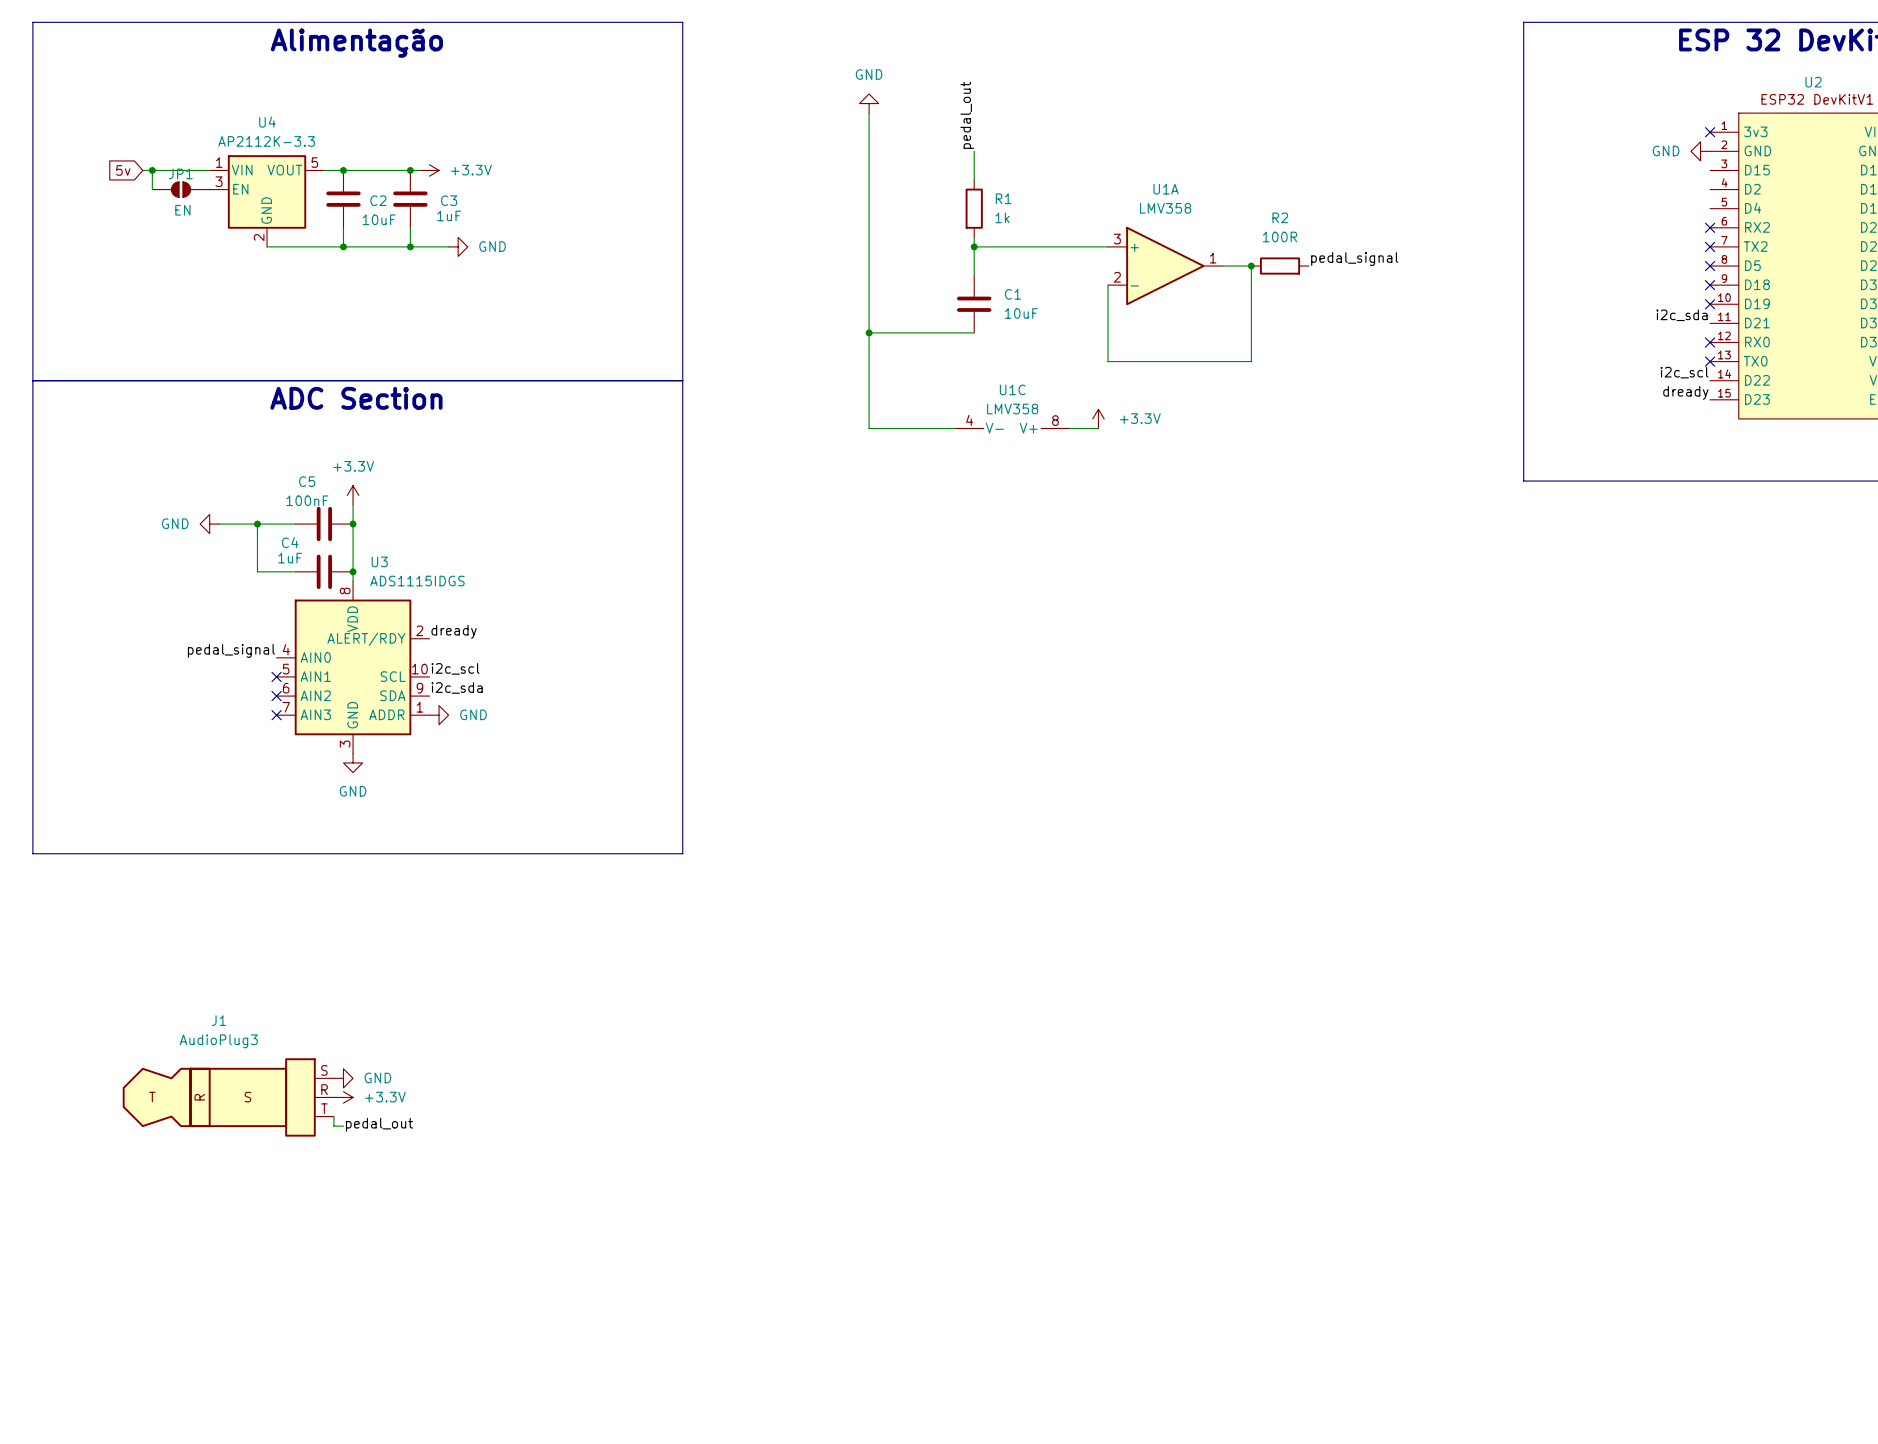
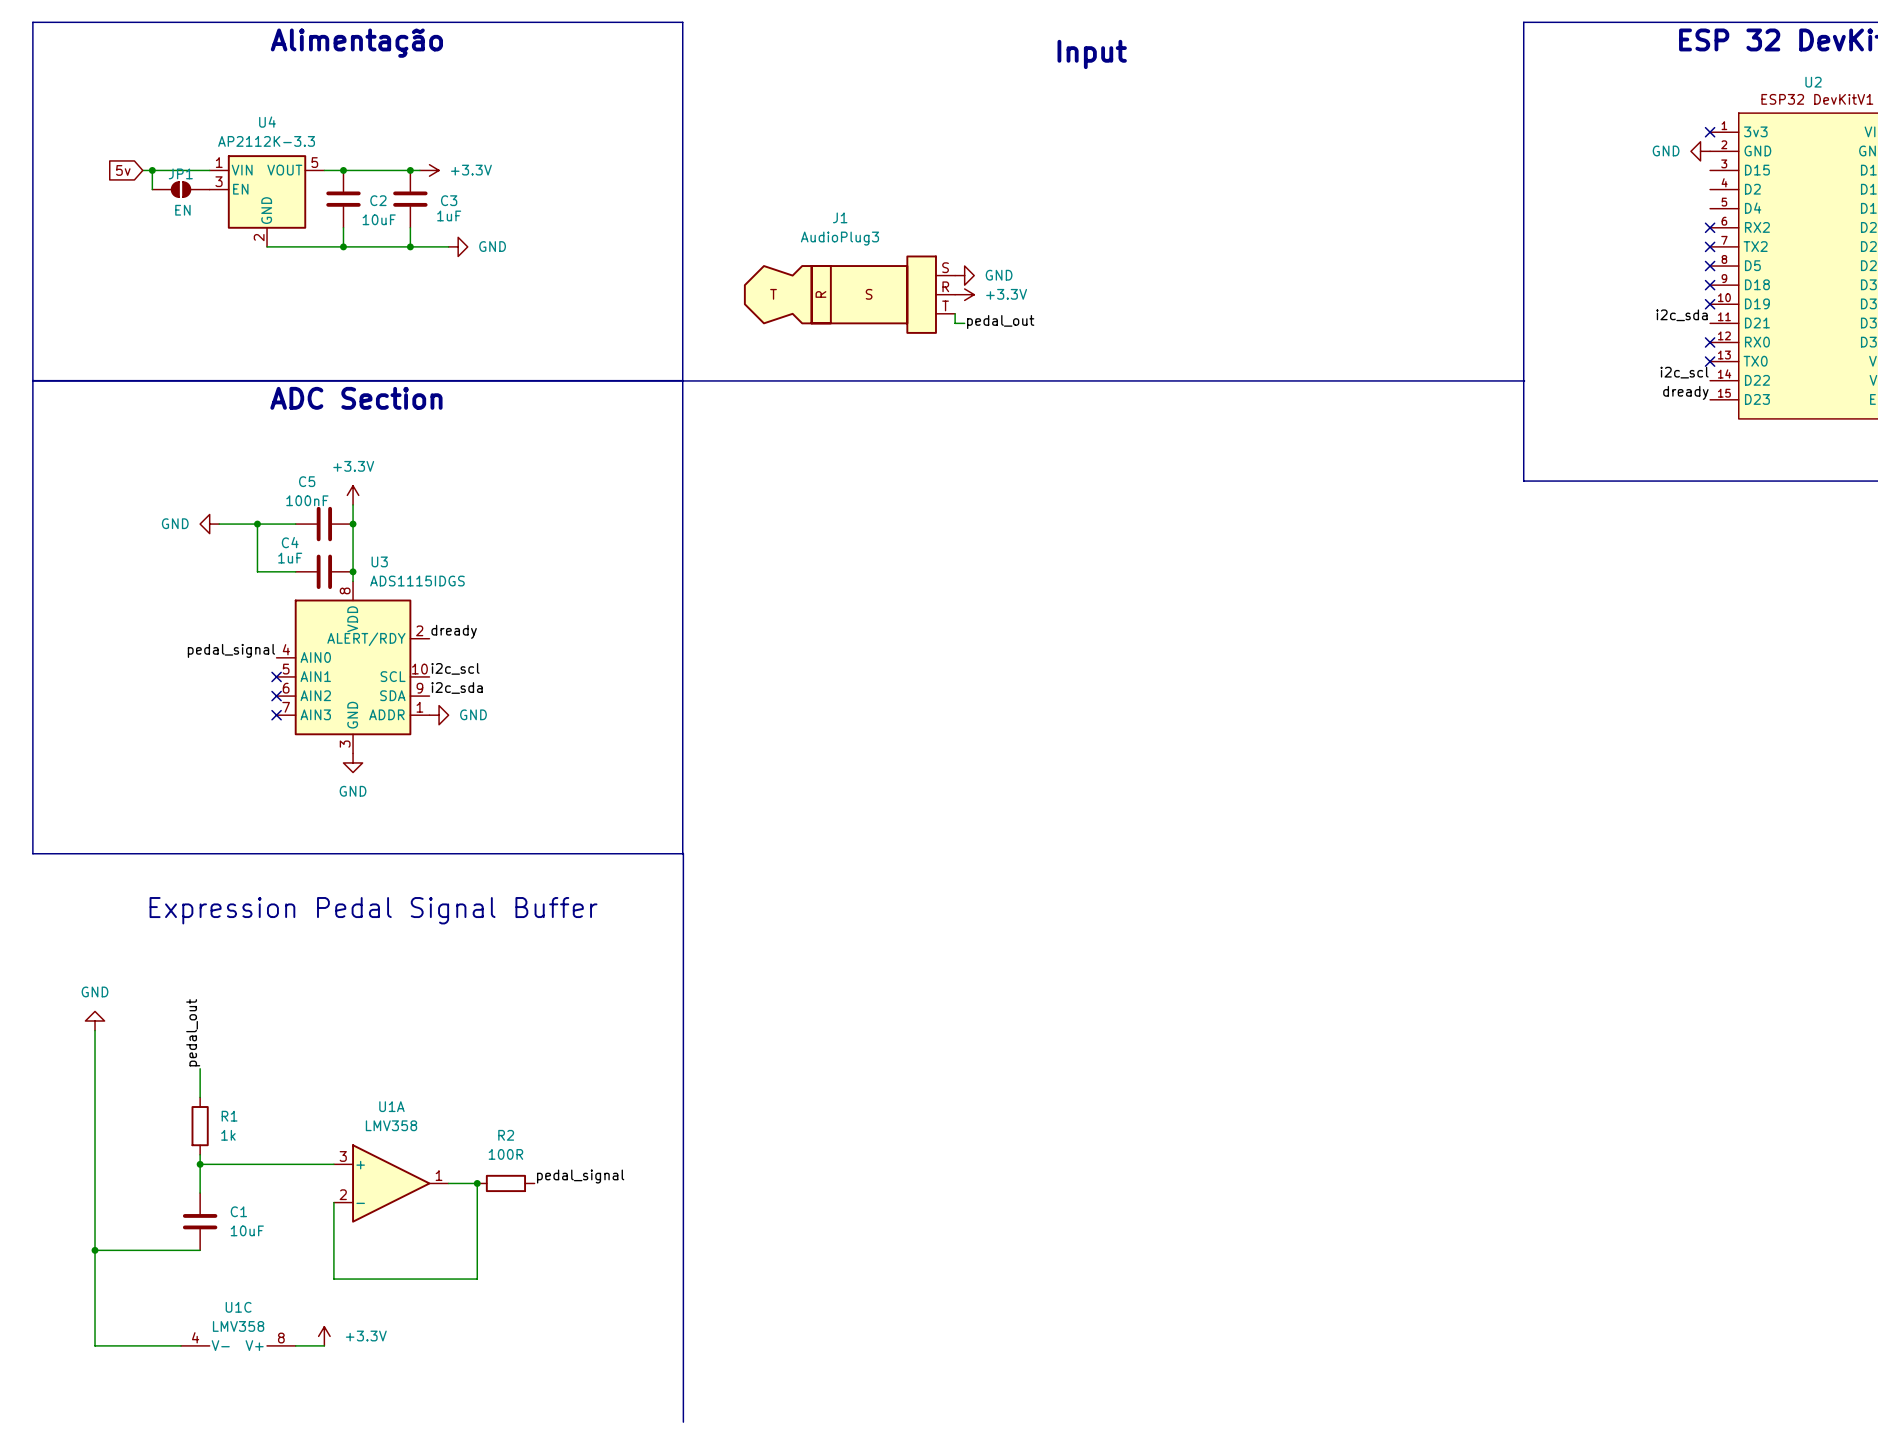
text: none -> Input (1092, 54)
power symbol: GND (869, 103) -> none
wire: (869, 113) (869, 428) (955, 428) -> none
label rotation: 0° (967, 115) -> 90° clockwise (1000, 322)
label position: pedal_out (967, 115) -> pedal_out (1000, 322)
wire: (974, 151) (974, 180) -> none
R1 position: (974, 208) -> (200, 1126)
wire: (974, 237) (974, 275) -> none
wire: (974, 246) (1108, 246) -> none
junction: (974, 246) -> none
label: pedal_signal (1354, 259) -> none
U1A position: (1165, 266) -> (391, 1183)
wire: (1222, 266) (1251, 266) (1251, 361) (1108, 361) (1108, 285) -> none
junction: (1251, 266) -> none
R2 position: (1280, 266) -> (505, 1183)
power symbol: none -> GND (964, 275)
C1 position: (974, 304) -> (200, 1221)
wire: none -> (955, 313) (955, 323) (964, 323)
wire: (869, 332) (974, 332) -> none
junction: (869, 332) -> none
line: none -> (683, 380) (1524, 380)
power symbol rotation: 0° (1098, 418) -> 90° clockwise (964, 294)
power symbol position: +3.3V (1098, 418) -> +3.3V (964, 294)
U1C position: (1012, 428) -> (238, 1345)
wire: (1069, 428) (1098, 428) -> none
line: none -> (683, 853) (683, 1422)
text: none -> Expression Pedal Signal Buffer (373, 910)
power symbol: none -> GND (95, 1021)
wire: none -> (95, 1030) (95, 1345) (181, 1345)
power symbol: GND (343, 1078) -> none
J1 position: (228, 1097) -> (849, 294)
power symbol: +3.3V (343, 1097) -> none
wire: (333, 1116) (333, 1126) (343, 1126) -> none
label rotation: 0° (379, 1124) -> 90° counterclockwise (193, 1032)
label position: pedal_out (379, 1124) -> pedal_out (193, 1032)
wire: none -> (200, 1154) (200, 1193)
wire: none -> (200, 1164) (333, 1164)
junction: none -> (200, 1164)
label: none -> pedal_signal (580, 1176)
wire: none -> (448, 1183) (477, 1183) (477, 1279) (333, 1279) (333, 1202)
junction: none -> (477, 1183)
wire: none -> (95, 1250) (200, 1250)
junction: none -> (95, 1250)
power symbol: none -> +3.3V (324, 1336)
wire: none -> (295, 1345) (324, 1345)

